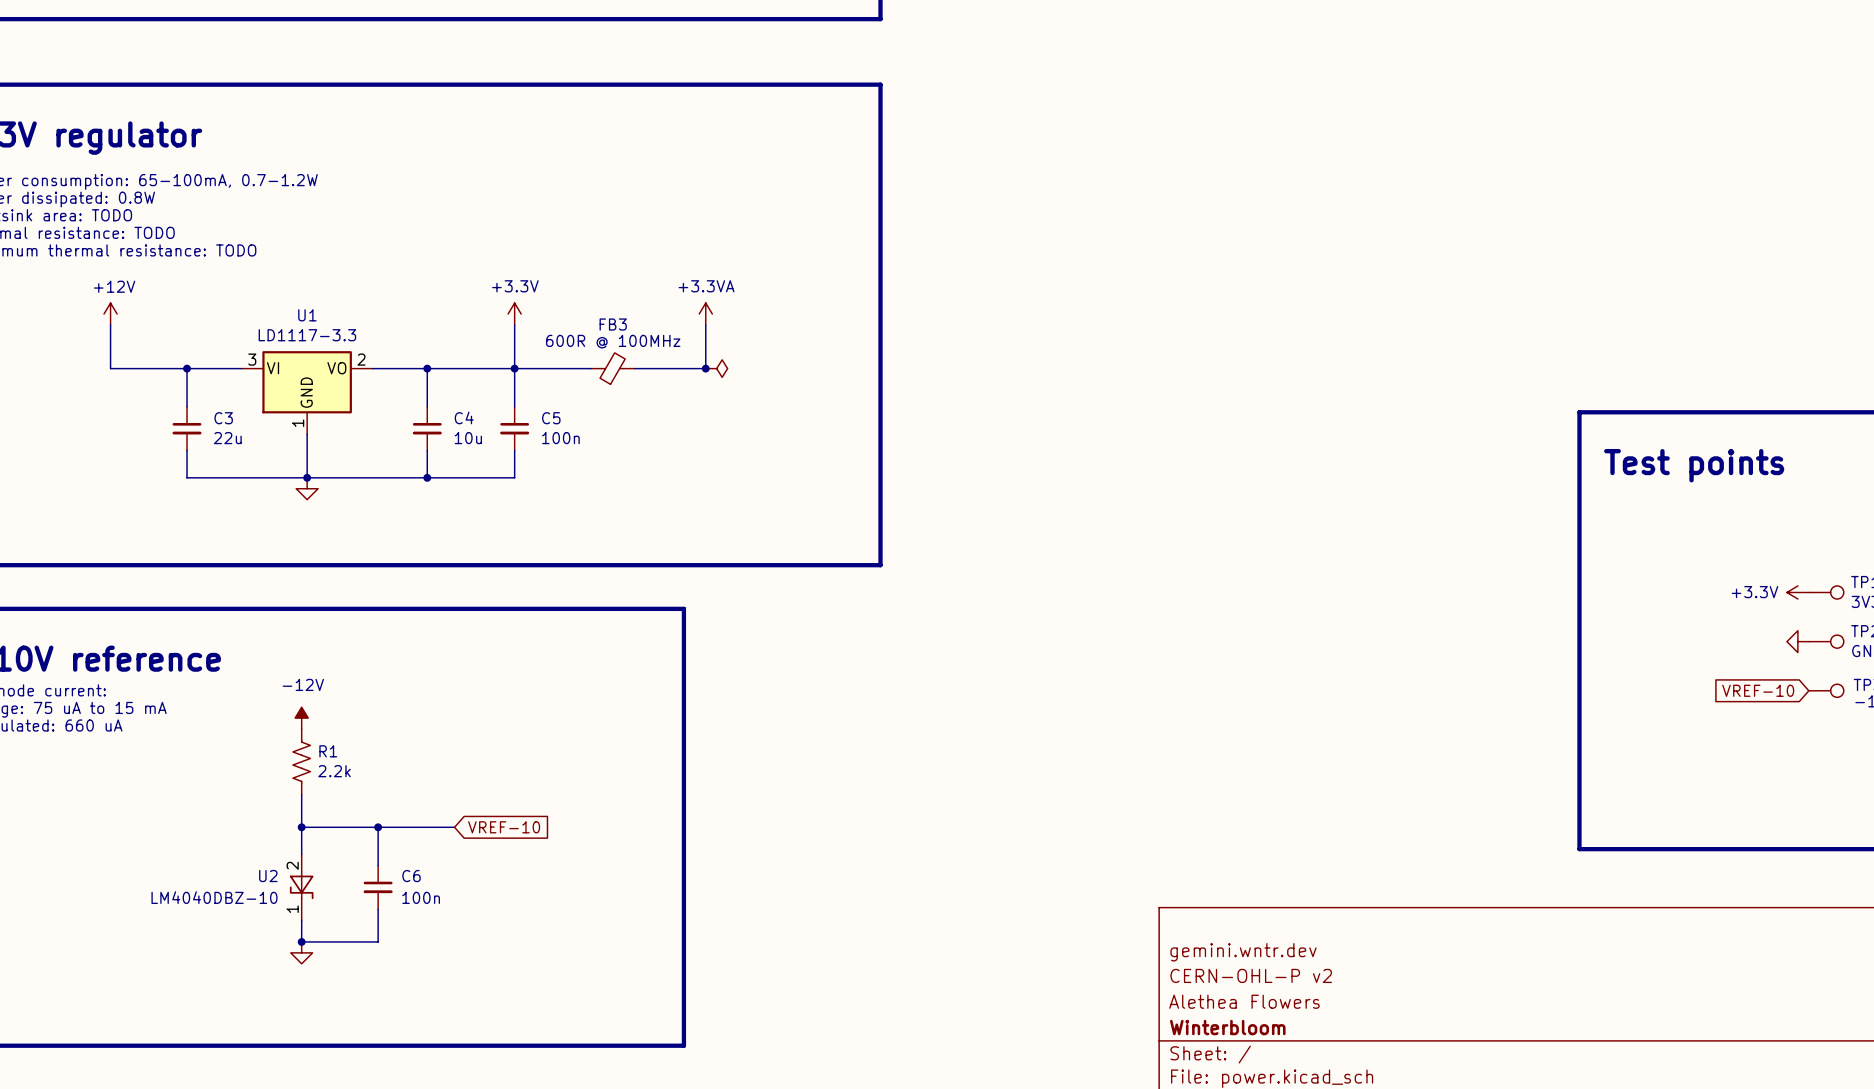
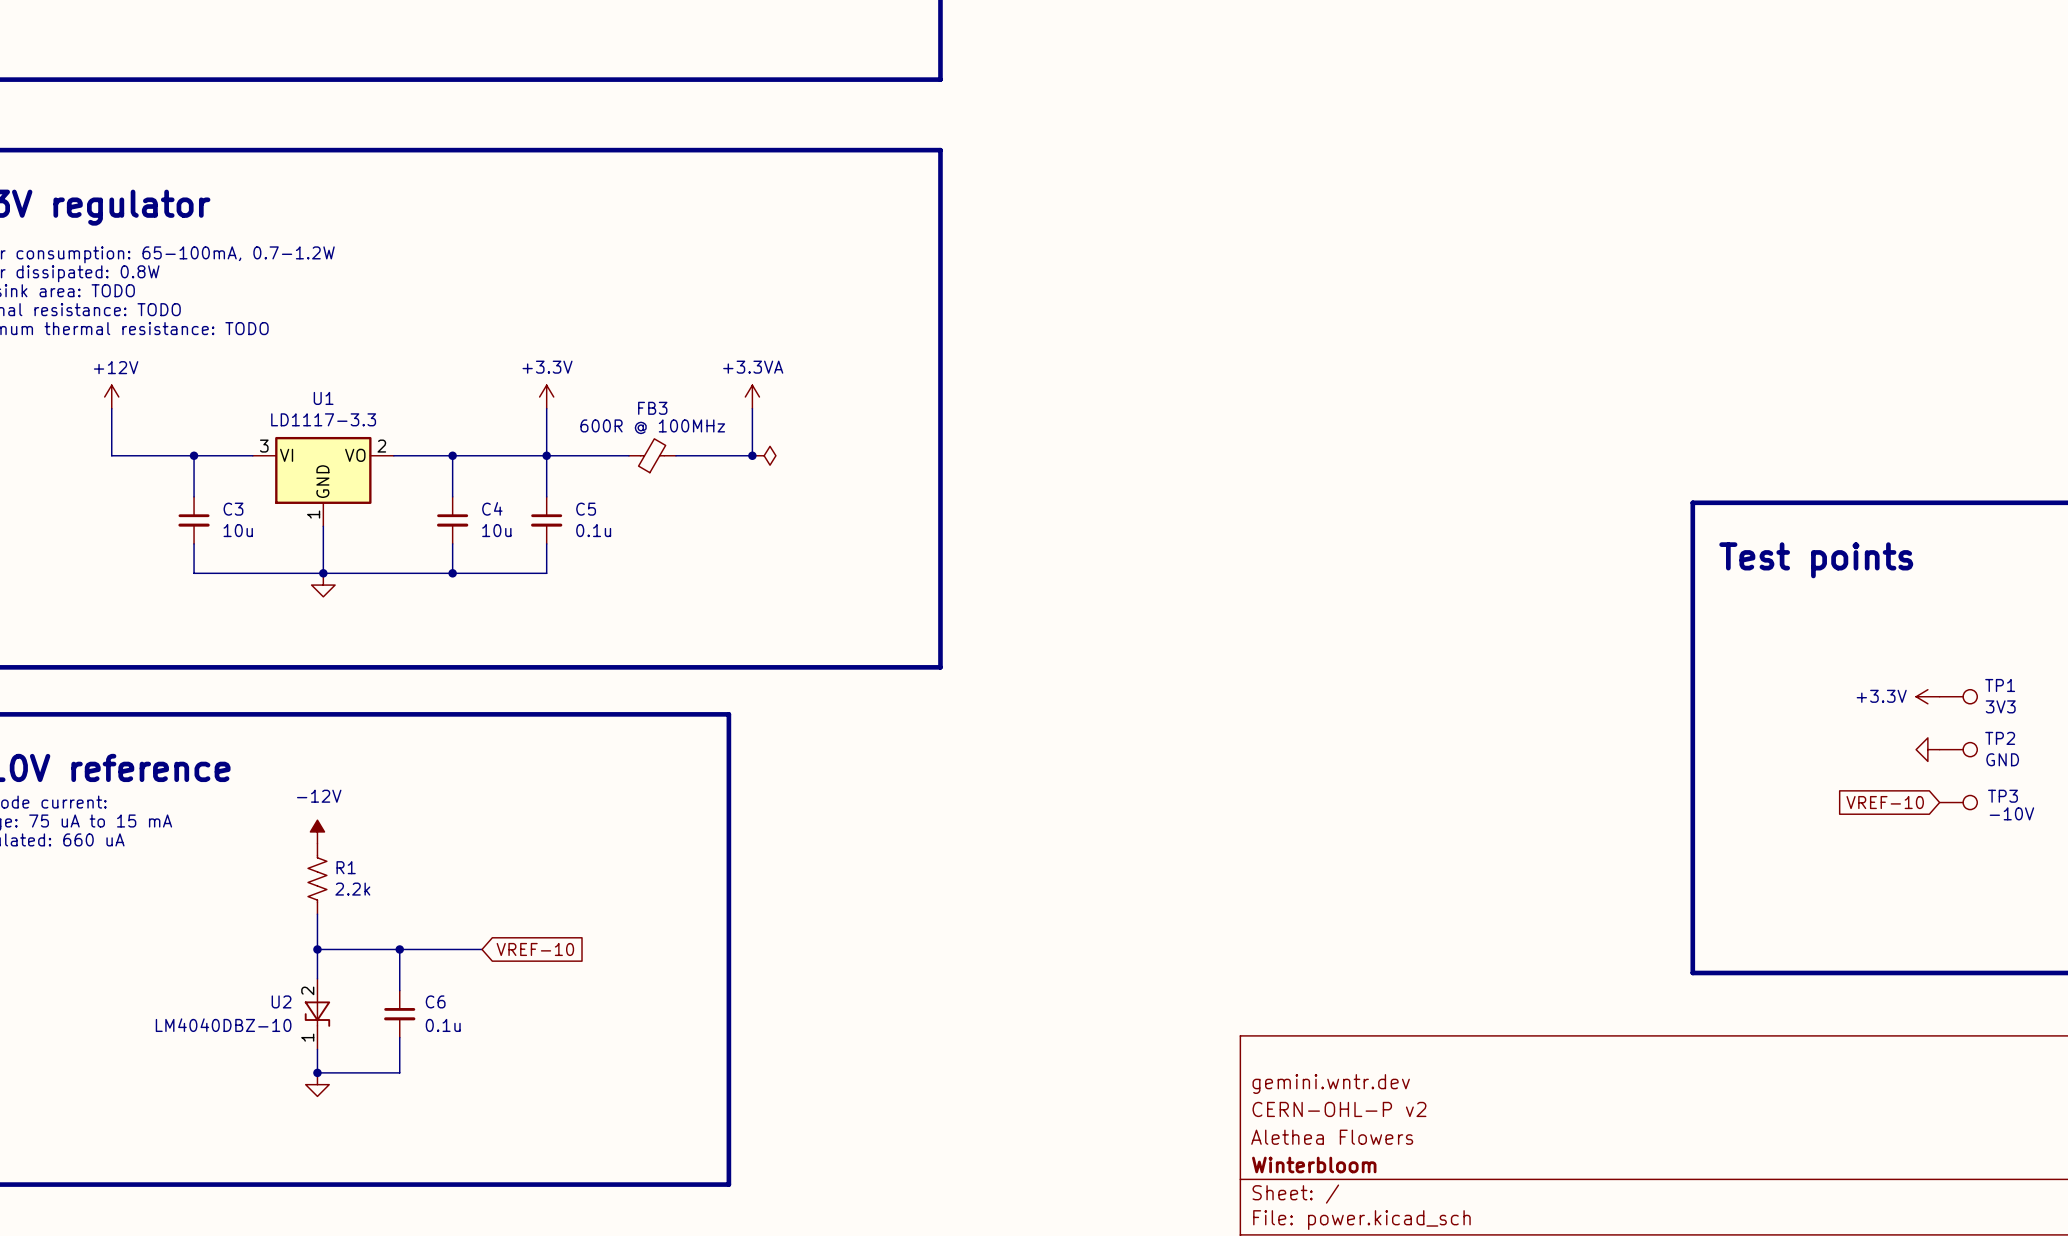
C3 value: 22u (227, 438) -> 10u (238, 530)
C5 value: 100n (560, 438) -> 0.1u (593, 530)
C6 value: 100n (421, 897) -> 0.1u (443, 1025)

